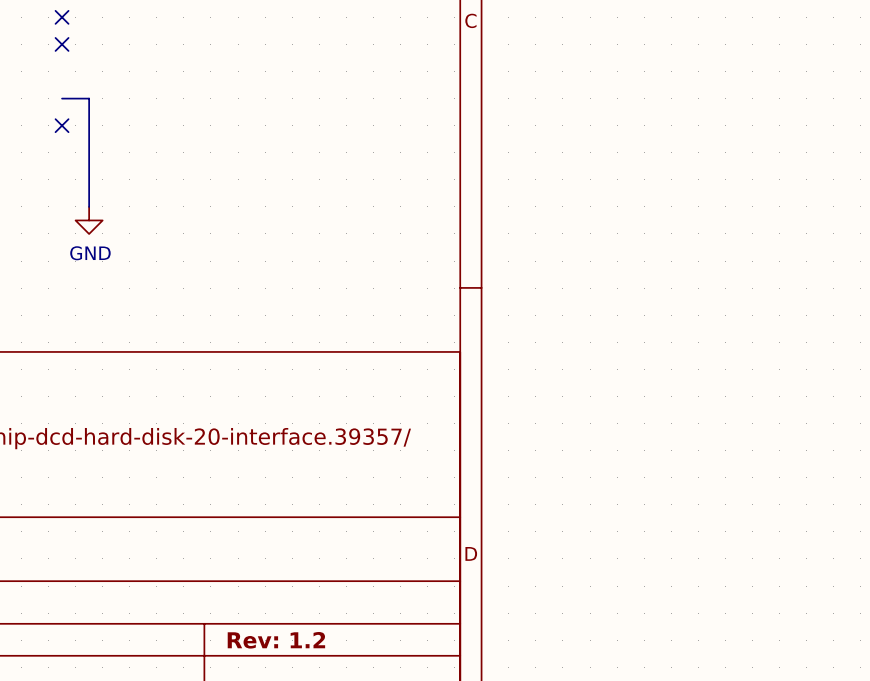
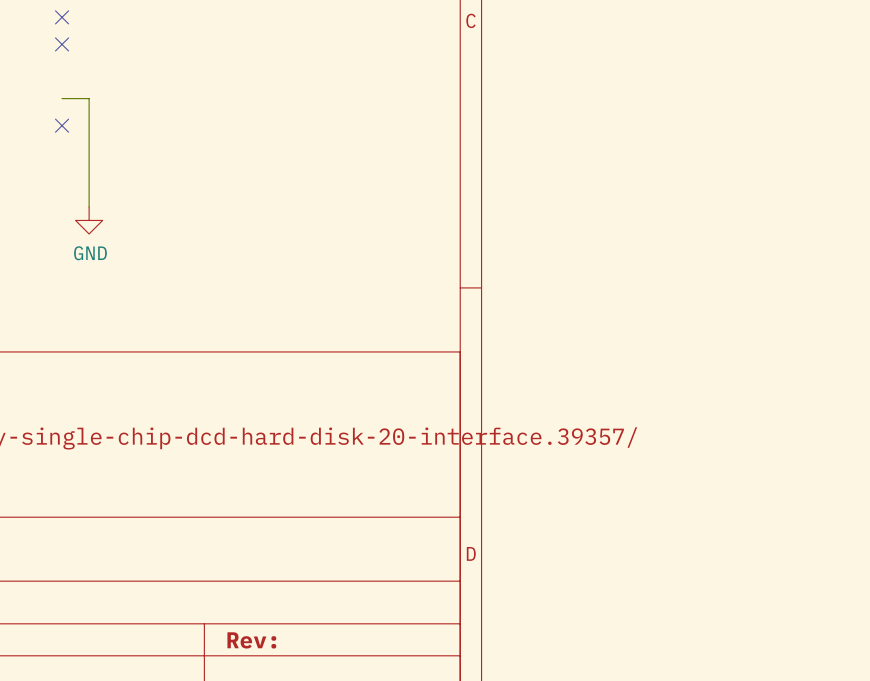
title block: Rev: 1.2 (276, 640) -> Rev: (251, 640)

